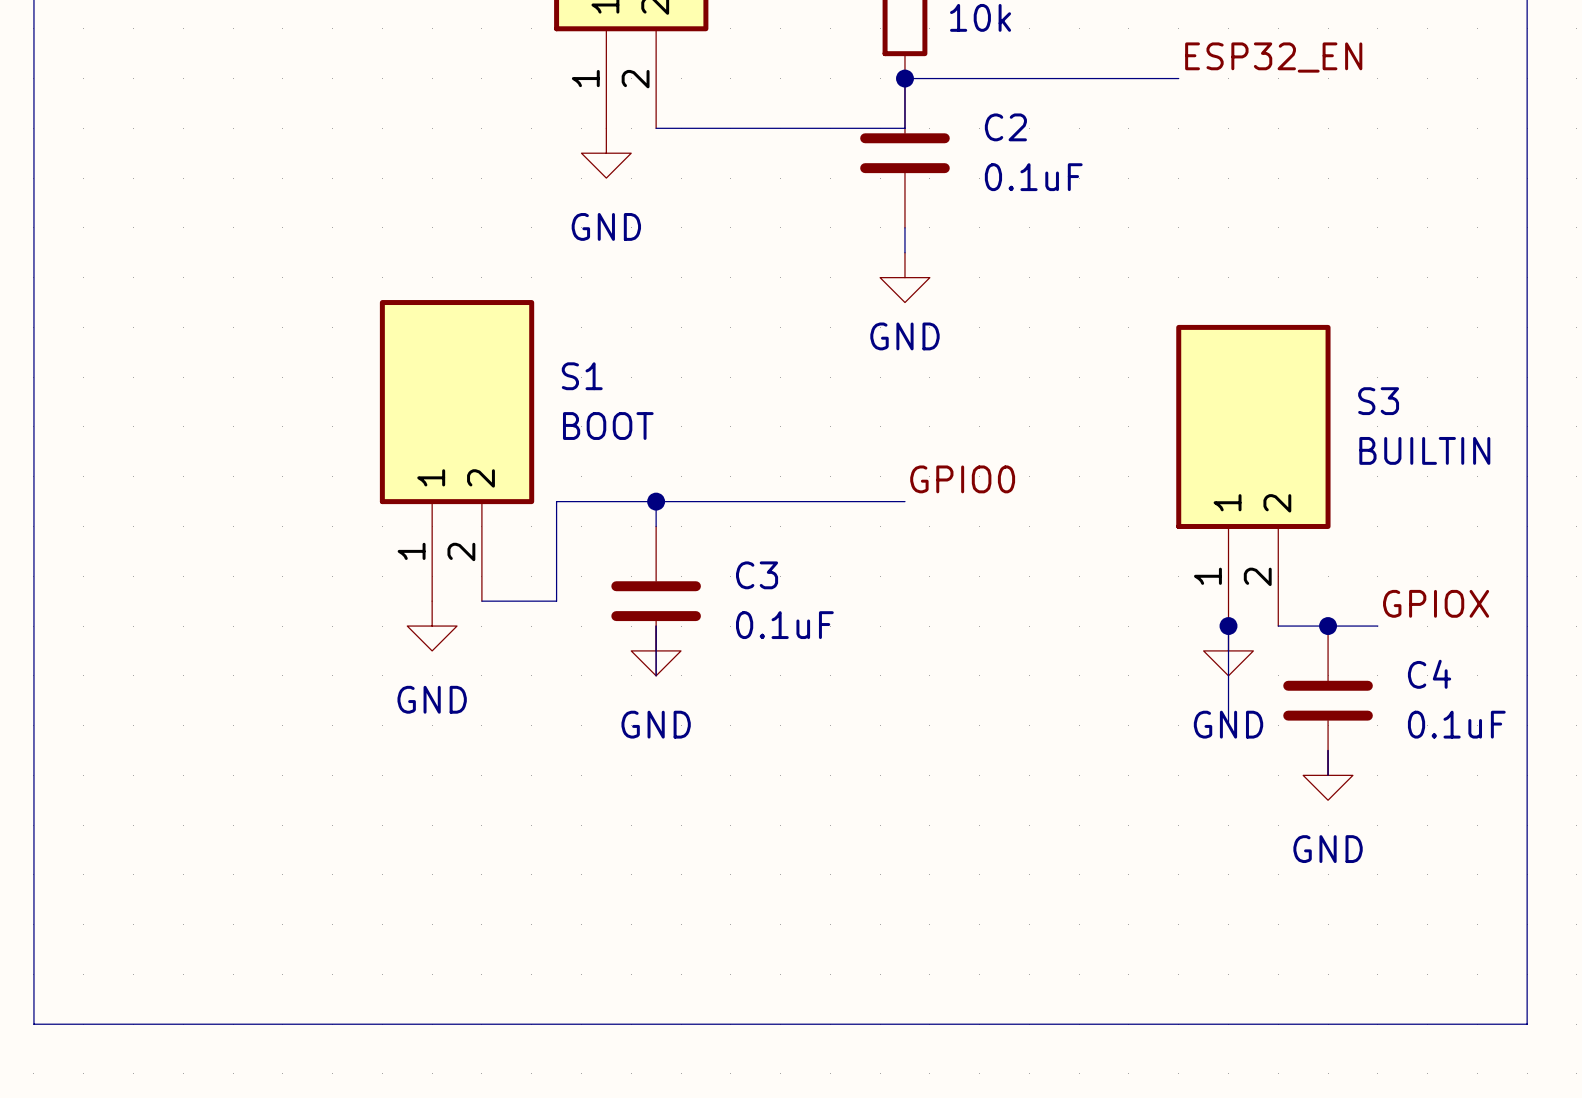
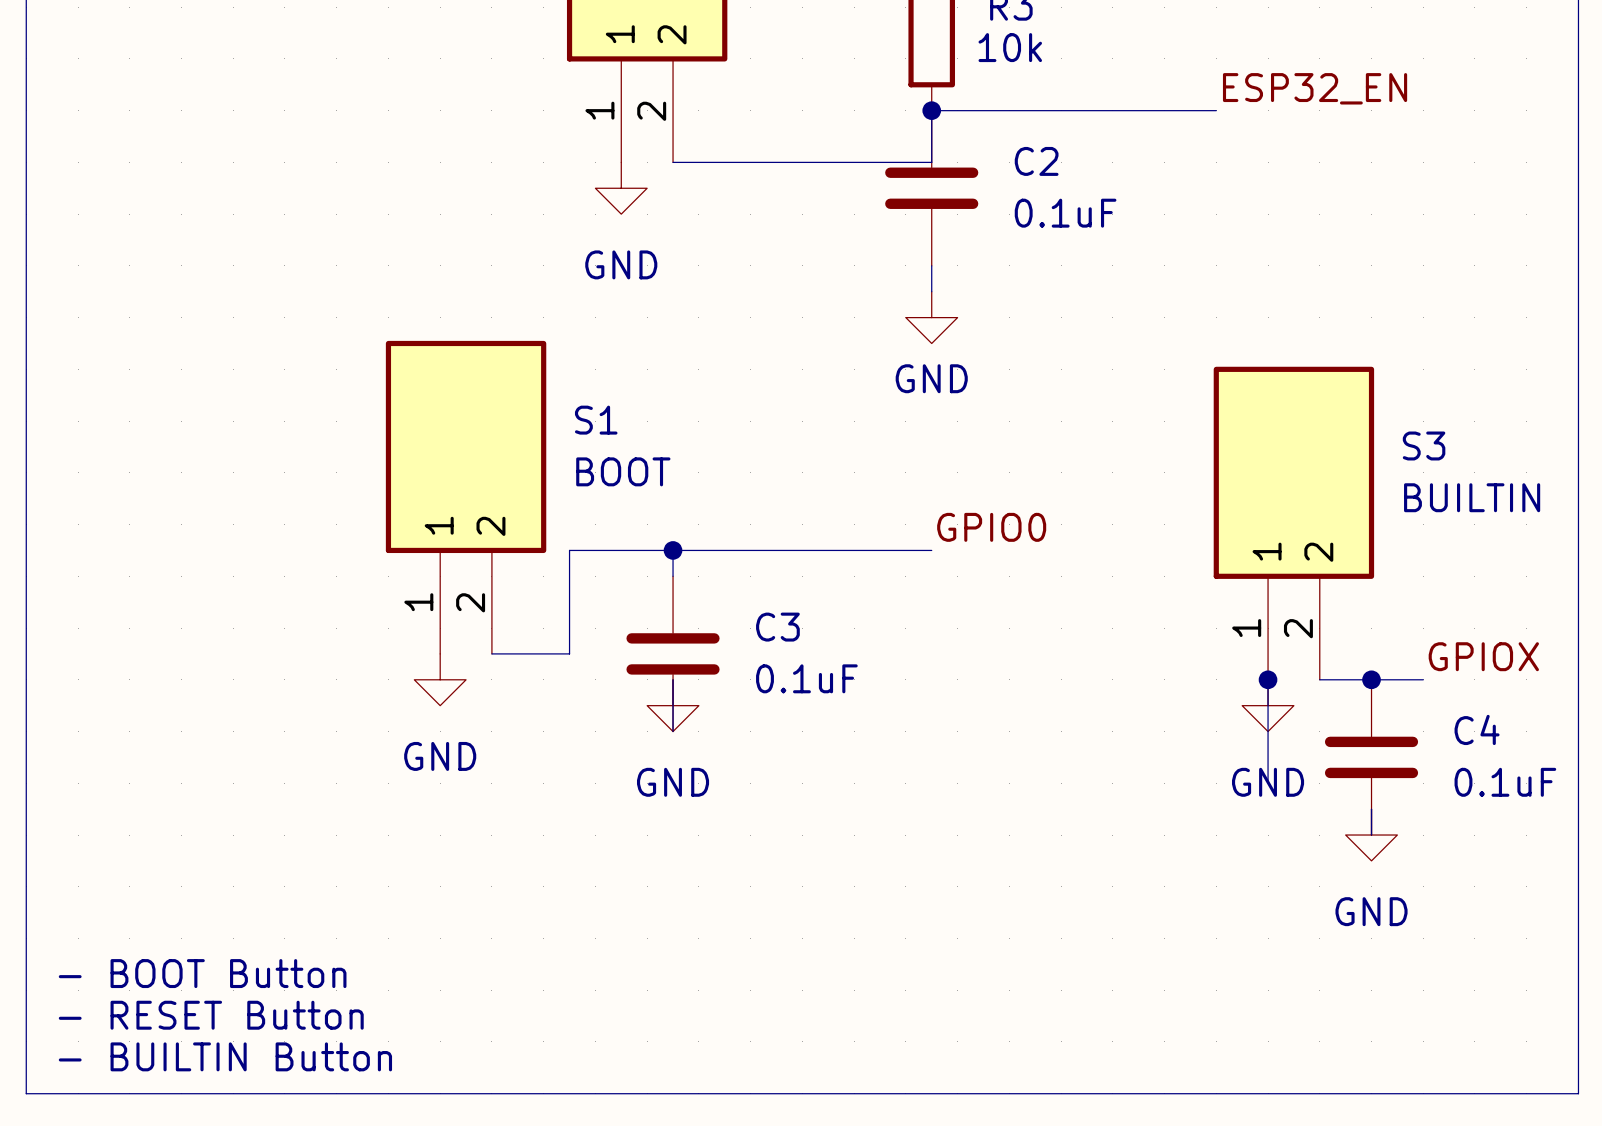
text: none -> - BOOT Button (202, 973)
text: none -> - RESET Button (211, 1015)
text: none -> - BUILTIN Button (225, 1056)

